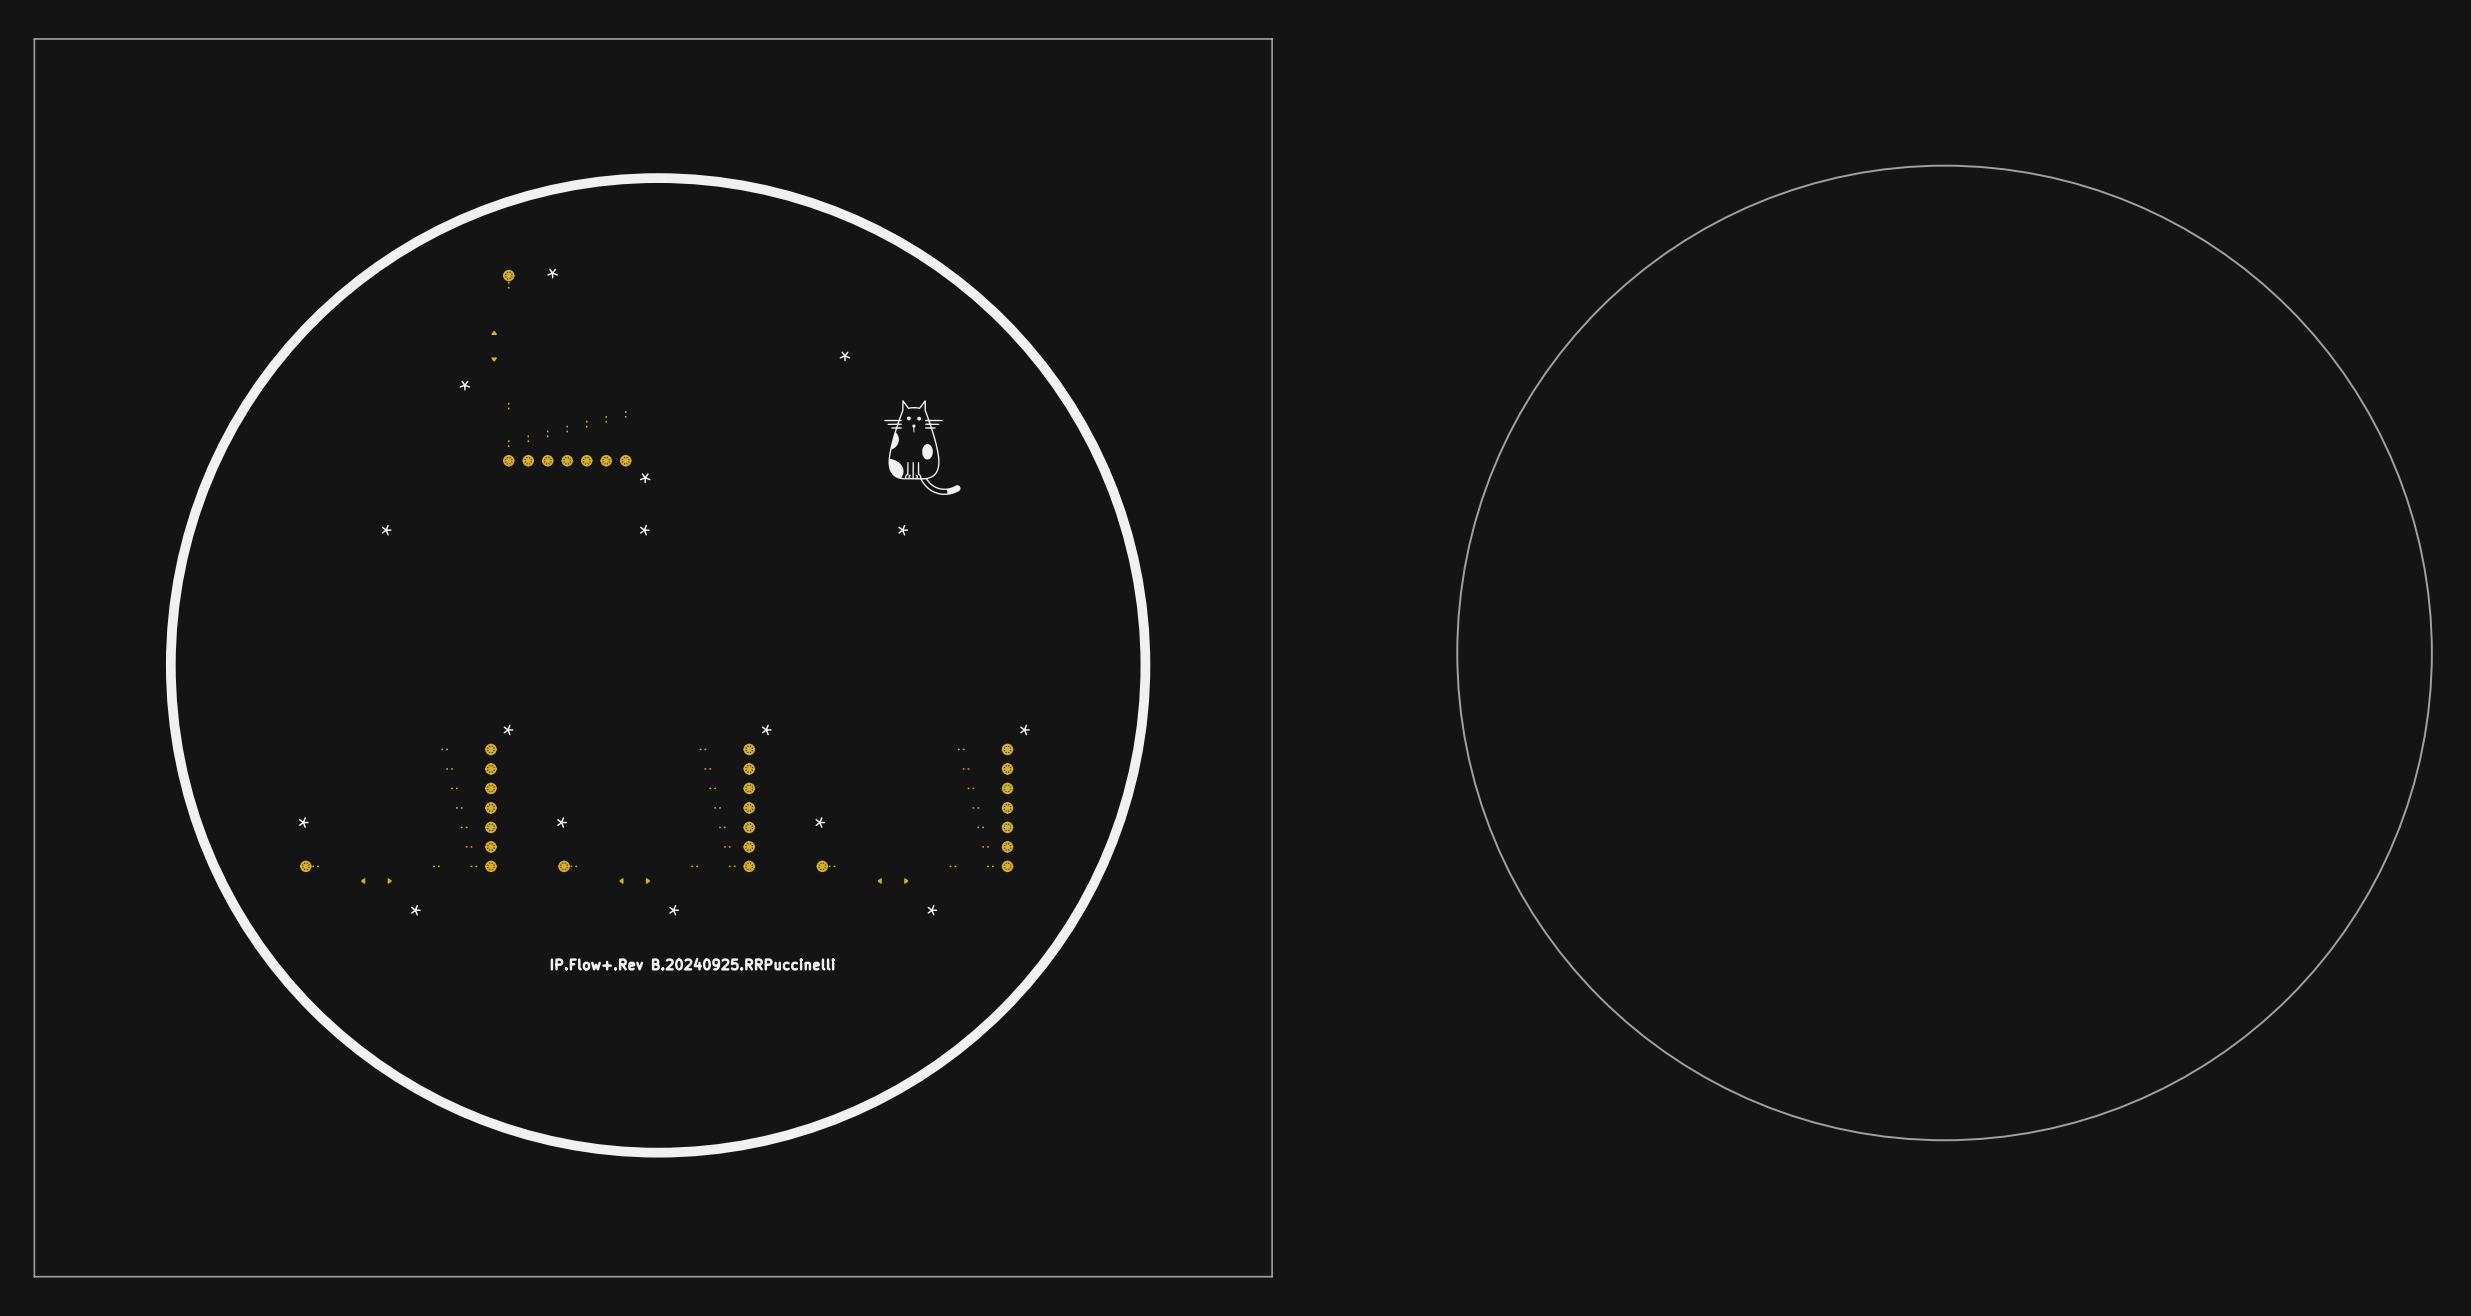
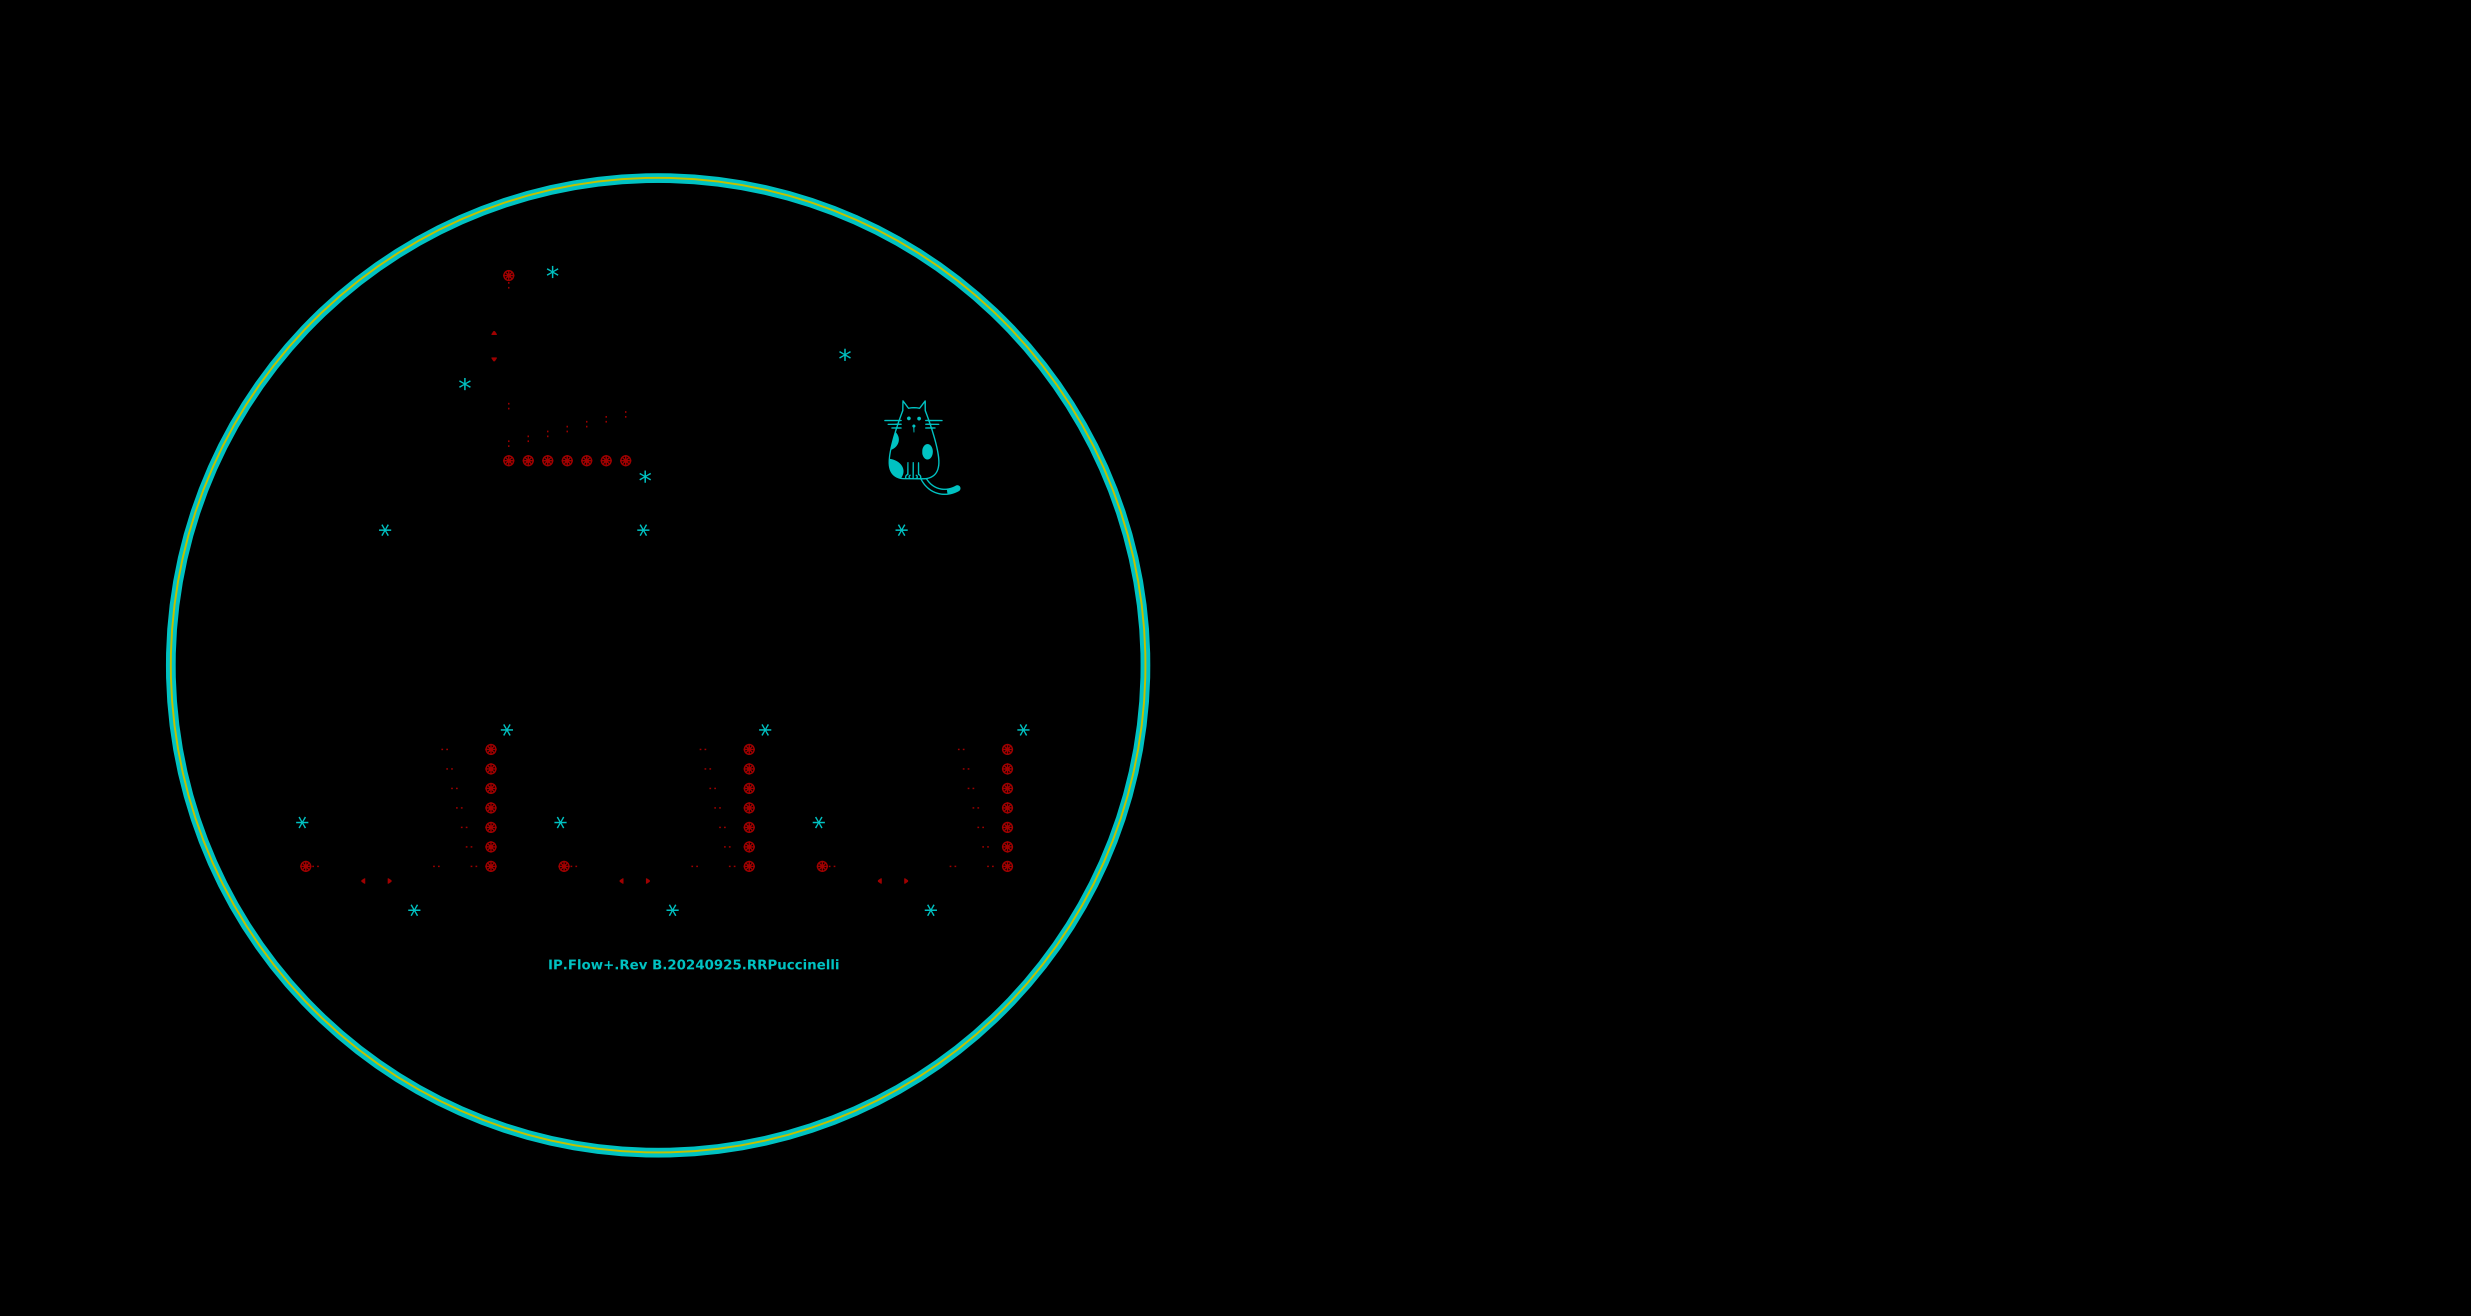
board edge: (34, 38) (1272, 38) (1272, 1276) (34, 1276) (34, 38) -> none
round board edge: [1456, 164, 2433, 1142] -> none
round board edge: none -> [169, 176, 1147, 1154]

